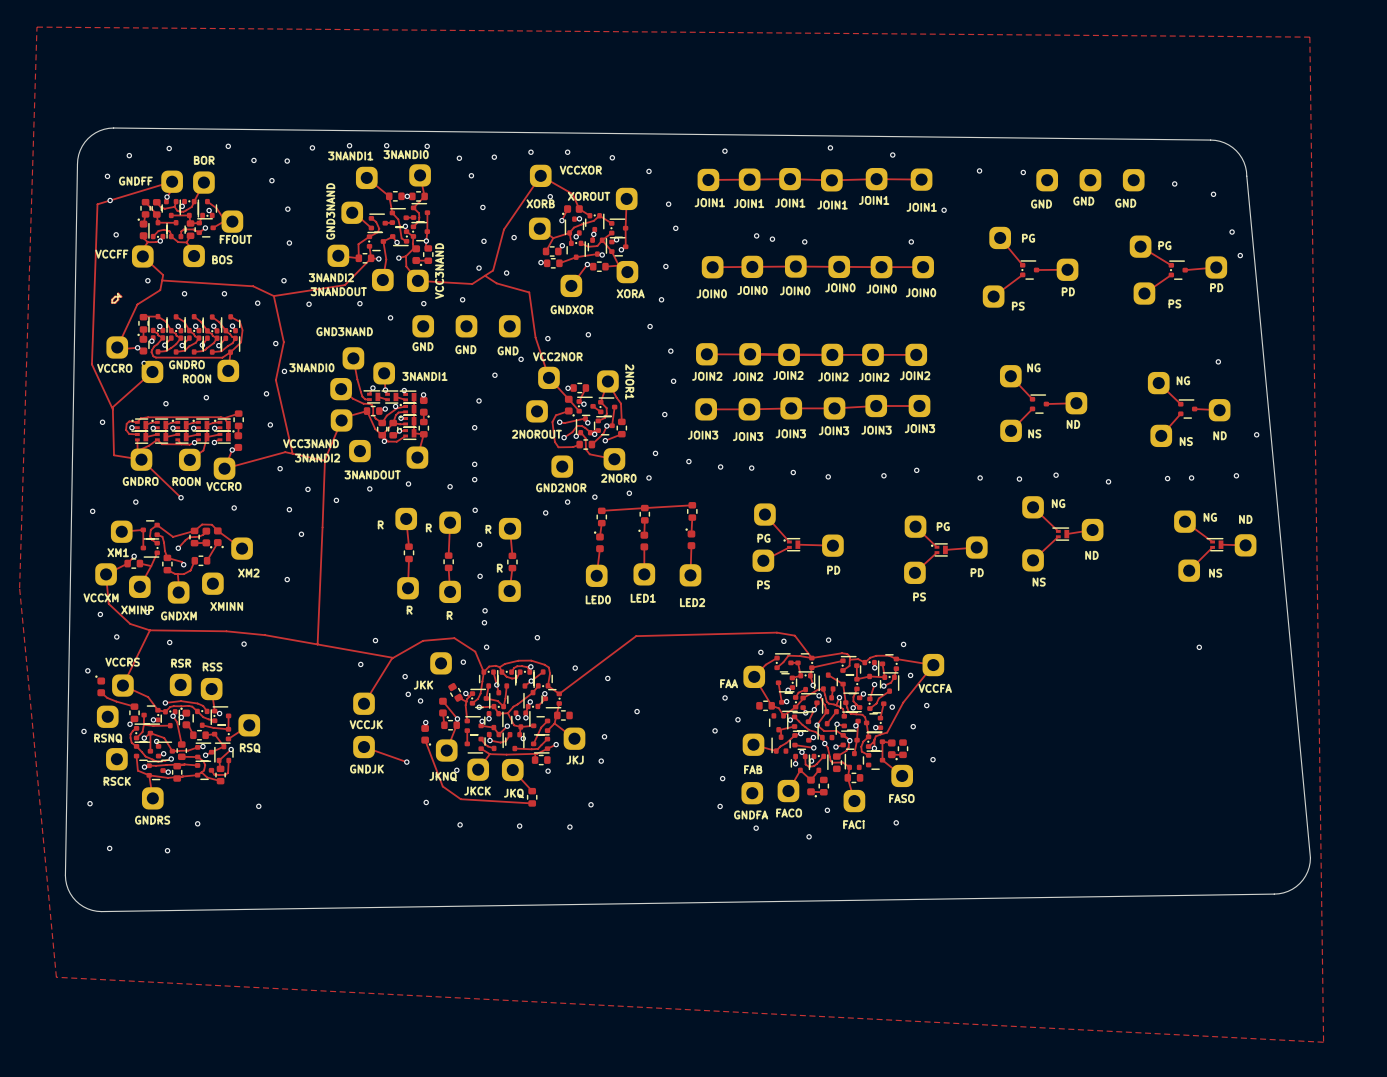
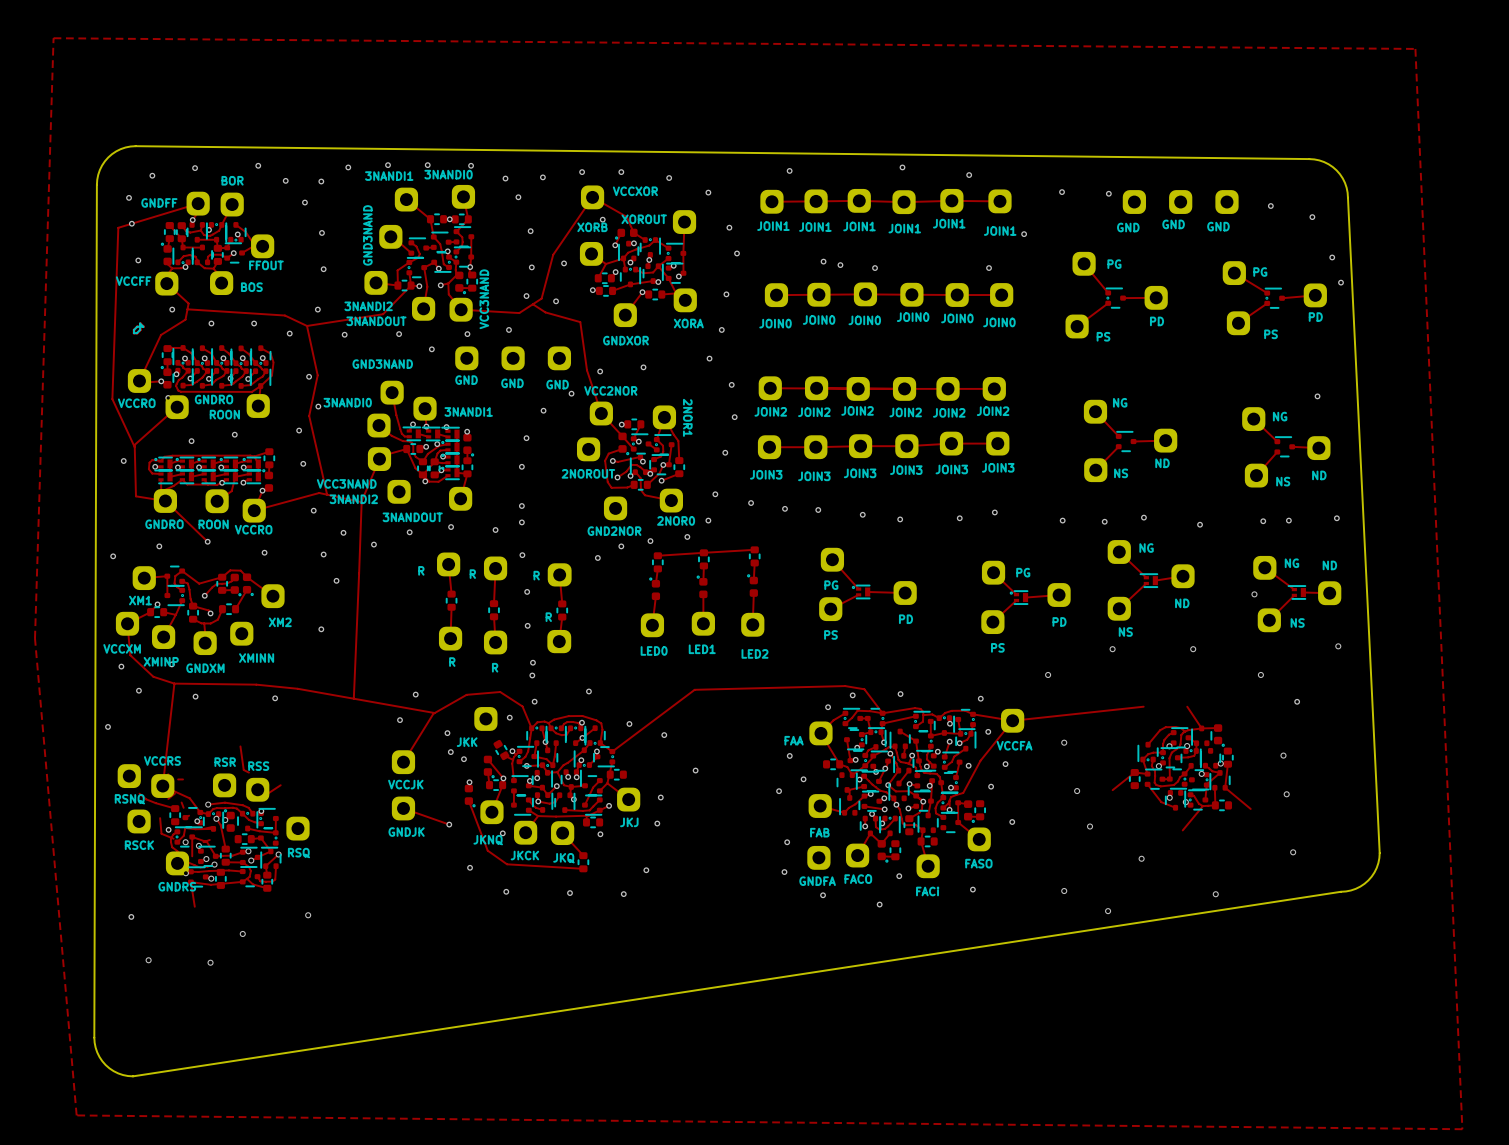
zone outline: (1309, 37) (1323, 1042) (56, 977) (19, 588) -> (1415, 48) (1462, 1129) (76, 1115) (35, 638)
board edge: (77, 164) (65, 875) (68, 889) (76, 900) (87, 908) (101, 911) (1274, 894) (1292, 889) (1305, 876) (1310, 857) (1246, 176) -> (96, 184) (94, 1037) (97, 1052) (105, 1065) (118, 1073) (133, 1076) (1346, 891) (1364, 883) (1374, 872) (1379, 853) (1347, 197)
via: (1256, 434) -> none
track: (1184, 521) (1212, 541) -> (1264, 567) (1294, 589)
part position: (1184, 521) -> (1264, 567)
part position: (1214, 544) -> (1296, 592)
track: (1221, 544) (1245, 545) -> (1303, 592) (1329, 593)
part position: (1245, 545) -> (1329, 593)
via: none -> (1254, 594)
track: (1212, 547) (1189, 570) -> (1294, 595) (1269, 620)
part position: (1189, 570) -> (1269, 620)
via: none -> (1338, 646)
via: none -> (1112, 649)
via: none -> (1193, 649)
via: none -> (1048, 674)
via: none -> (1260, 674)
track: (149, 630) (122, 685) (148, 697) (157, 710) (165, 711) (170, 707) (188, 705) (192, 706) (203, 717) (214, 720) -> (174, 683) (162, 786) (189, 798) (200, 812) (208, 814) (213, 808) (233, 807) (236, 808) (248, 819) (261, 823)
track: none -> (1143, 706) (1012, 720)
track: none -> (1187, 706) (1201, 728)
track: none -> (1218, 728) (1201, 728)
track: none -> (1201, 728) (1188, 730) (1181, 734) (1179, 747) (1171, 752) (1169, 758) (1169, 779) (1162, 779)
track: none -> (1185, 731) (1181, 728) (1165, 727) (1160, 730) (1148, 744)
track: none -> (1173, 732) (1164, 739) (1163, 752) (1148, 754) (1142, 759) (1147, 774) (1134, 772) (1112, 790)
part: none -> (1219, 735)
part: none -> (1201, 735)
part: none -> (1181, 737)
track: none -> (1188, 737) (1196, 743) (1194, 755) (1177, 757)
part position: (180, 684) -> (224, 785)
part: (100, 685) -> none
part position: (122, 685) -> (162, 786)
via: none -> (1064, 742)
via: none -> (1169, 746)
via: none -> (1187, 746)
part position: (211, 689) -> (257, 789)
track: (101, 692) (107, 697) (134, 706) -> (139, 793) (146, 799) (175, 808)
part: none -> (1148, 752)
via: none -> (1283, 755)
part: none -> (1170, 757)
part: none -> (1227, 757)
part: none -> (1191, 758)
part: none -> (1210, 758)
track: none -> (1153, 759) (1151, 765) (1154, 770) (1154, 782) (1160, 786) (1173, 784) (1191, 765)
track: (165, 702) (181, 701) (197, 703) (203, 705) (207, 711) -> (208, 804) (224, 802) (242, 805) (248, 807) (252, 813)
via: (165, 702) -> none
via: none -> (1220, 763)
via: none -> (1158, 766)
track: none -> (1205, 765) (1212, 771) (1220, 772) (1206, 784)
track: none -> (1215, 765) (1220, 763) (1227, 764) (1225, 787) (1250, 808)
track: (175, 711) (173, 716) (177, 722) (181, 744) -> (218, 814) (216, 818) (220, 825) (225, 849)
part: (134, 712) -> none
via: (219, 713) -> none
via: none -> (1201, 773)
part: (151, 715) -> none
part: (221, 715) -> none
track: (228, 715) (228, 729) (202, 725) -> (275, 818) (275, 832) (247, 828)
via: (173, 716) -> none
via: (181, 717) -> none
part position: (185, 717) -> (229, 820)
part: (170, 718) -> none
part: (202, 718) -> none
via: (153, 719) -> none
part: none -> (1134, 779)
part: none -> (1155, 779)
part: none -> (1177, 779)
part: none -> (1199, 779)
part: none -> (1220, 780)
via: (130, 724) -> none
track: none -> (1147, 784) (1161, 802) (1175, 807)
track: (170, 725) (143, 724) (142, 731) (136, 737) -> (213, 828) (185, 827) (183, 835) (177, 842)
part position: (249, 725) -> (297, 828)
track: none -> (1206, 784) (1205, 799)
track: none -> (1214, 787) (1215, 805) (1202, 806)
track: (136, 728) (130, 734) (131, 742) (145, 756) (158, 761) (171, 758) -> (177, 831) (170, 838) (172, 847) (187, 861) (200, 867) (214, 864)
via: none -> (1077, 791)
via: (83, 731) -> none
part: (143, 733) -> none
via: none -> (1286, 794)
part: (221, 734) -> none
track: none -> (1190, 794) (1193, 795) (1202, 806)
part: (199, 735) -> none
track: (205, 735) (214, 734) (223, 746) (205, 755) -> (251, 839) (260, 838) (270, 851) (251, 860)
via: none -> (1169, 797)
via: (144, 738) -> none
part: none -> (1175, 800)
part: none -> (1197, 799)
part footprint: [155, 741, 176, 762] -> [182, 807, 204, 829]
via: (156, 741) -> none
via: none -> (1185, 802)
via: none -> (208, 804)
track: none -> (1202, 806) (1182, 830)
part: none -> (1221, 805)
track: (202, 746) (188, 750) (172, 751) (164, 737) (150, 733) (150, 751) -> (248, 851) (232, 855) (215, 856) (207, 842) (192, 836) (192, 856)
via: (202, 746) -> none
track: (231, 749) (219, 760) (220, 768) -> (278, 854) (265, 866) (267, 875)
part: (181, 750) -> none
part: (143, 751) -> none
part: (204, 752) -> none
part: none -> (175, 815)
via: (163, 753) -> none
part: (223, 753) -> none
via: (205, 755) -> none
track: (181, 756) (197, 757) (205, 764) (204, 770) (197, 775) (168, 777) (149, 775) (152, 798) -> (225, 862) (242, 862) (250, 871) (249, 876) (242, 881) (211, 884) (190, 882) (194, 906)
via: none -> (216, 818)
part: none -> (268, 818)
via: none -> (225, 820)
part: none -> (247, 821)
part: none -> (213, 821)
part footprint: [146, 760, 166, 781] -> [174, 826, 196, 848]
track: (228, 760) (228, 772) (225, 774) (214, 774) (211, 770) -> (276, 866) (275, 879) (272, 881) (260, 881) (257, 876)
via: none -> (1090, 826)
track: (197, 765) (144, 767) -> (242, 871) (185, 873)
part: (204, 770) -> none
via: (168, 772) -> none
part: (177, 772) -> none
track: (201, 772) (207, 777) (220, 781) -> (246, 878) (252, 884) (267, 888)
part rotation: 0° (220, 774) -> 90° clockwise (244, 839)
part: none -> (268, 838)
via: none -> (185, 842)
via: none -> (198, 845)
via: none -> (248, 851)
via: none -> (1293, 852)
via: none -> (278, 854)
part: none -> (208, 856)
part: none -> (225, 855)
part: none -> (250, 857)
via: none -> (206, 859)
part: none -> (270, 858)
via: none -> (1141, 858)
via: none -> (251, 860)
via: none -> (214, 864)
via: (90, 803) -> none
via: (258, 806) -> none
via: none -> (185, 873)
part: none -> (250, 876)
part: none -> (198, 876)
via: none -> (211, 878)
part: none -> (220, 878)
part: none -> (267, 881)
via: (197, 823) -> none
via: none -> (1064, 891)
via: none -> (1215, 894)
via: none -> (1108, 911)
via: none -> (308, 915)
via: (167, 850) -> none
via: none -> (242, 933)
via: none -> (148, 960)
via: none -> (210, 962)

